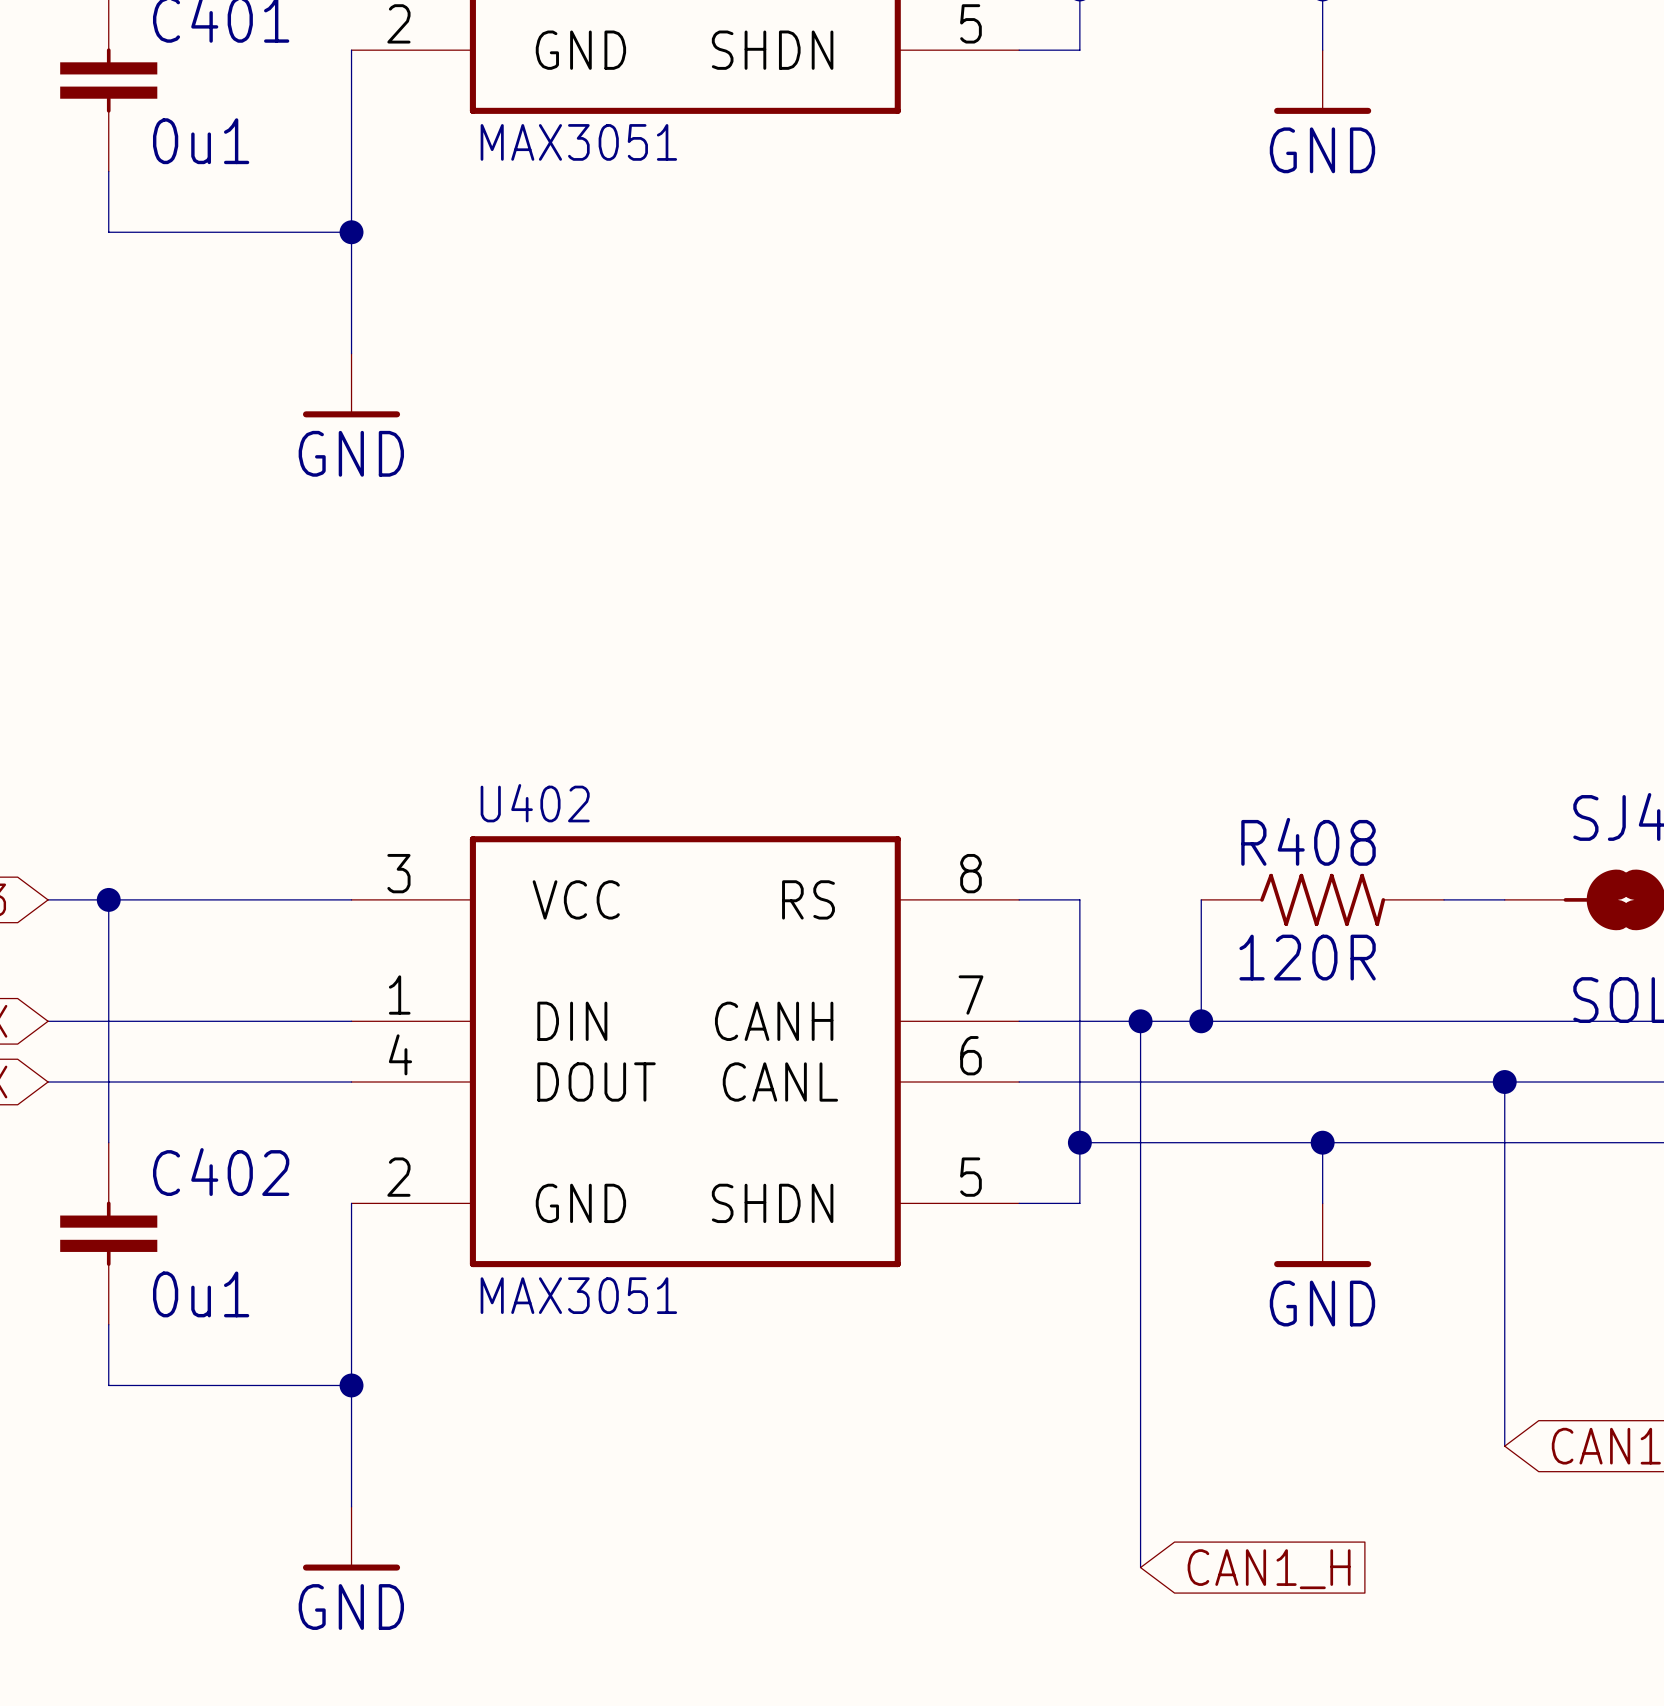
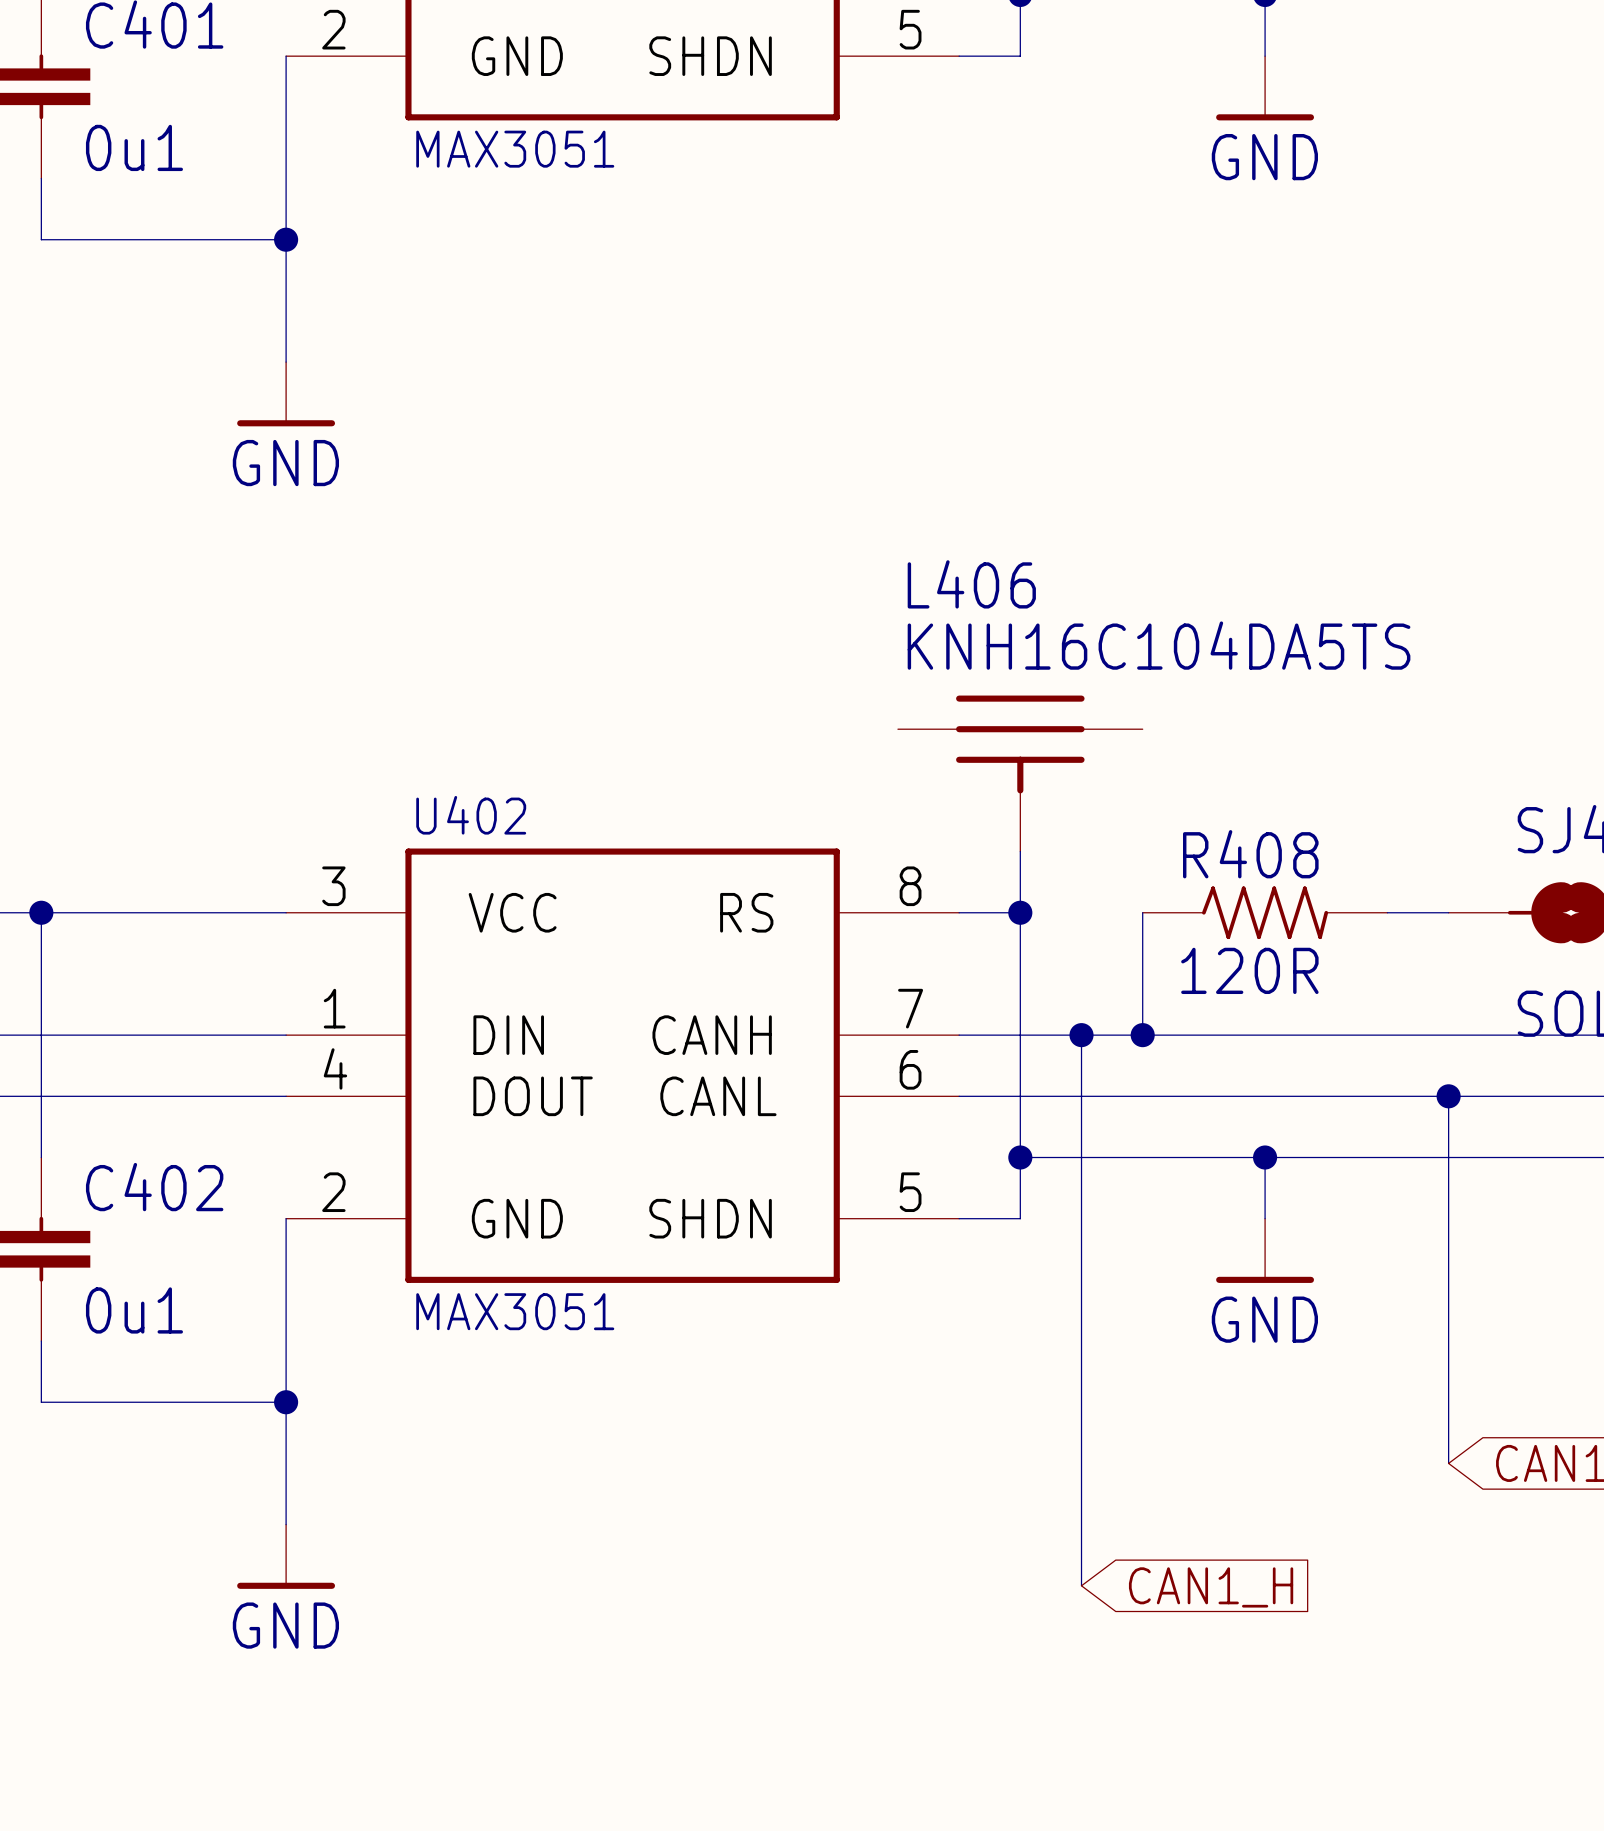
L406: none -> KNH16C104DA5TS (1020, 773)
wire: none -> (1020, 851) (1020, 912)
junction: none -> (1020, 912)

